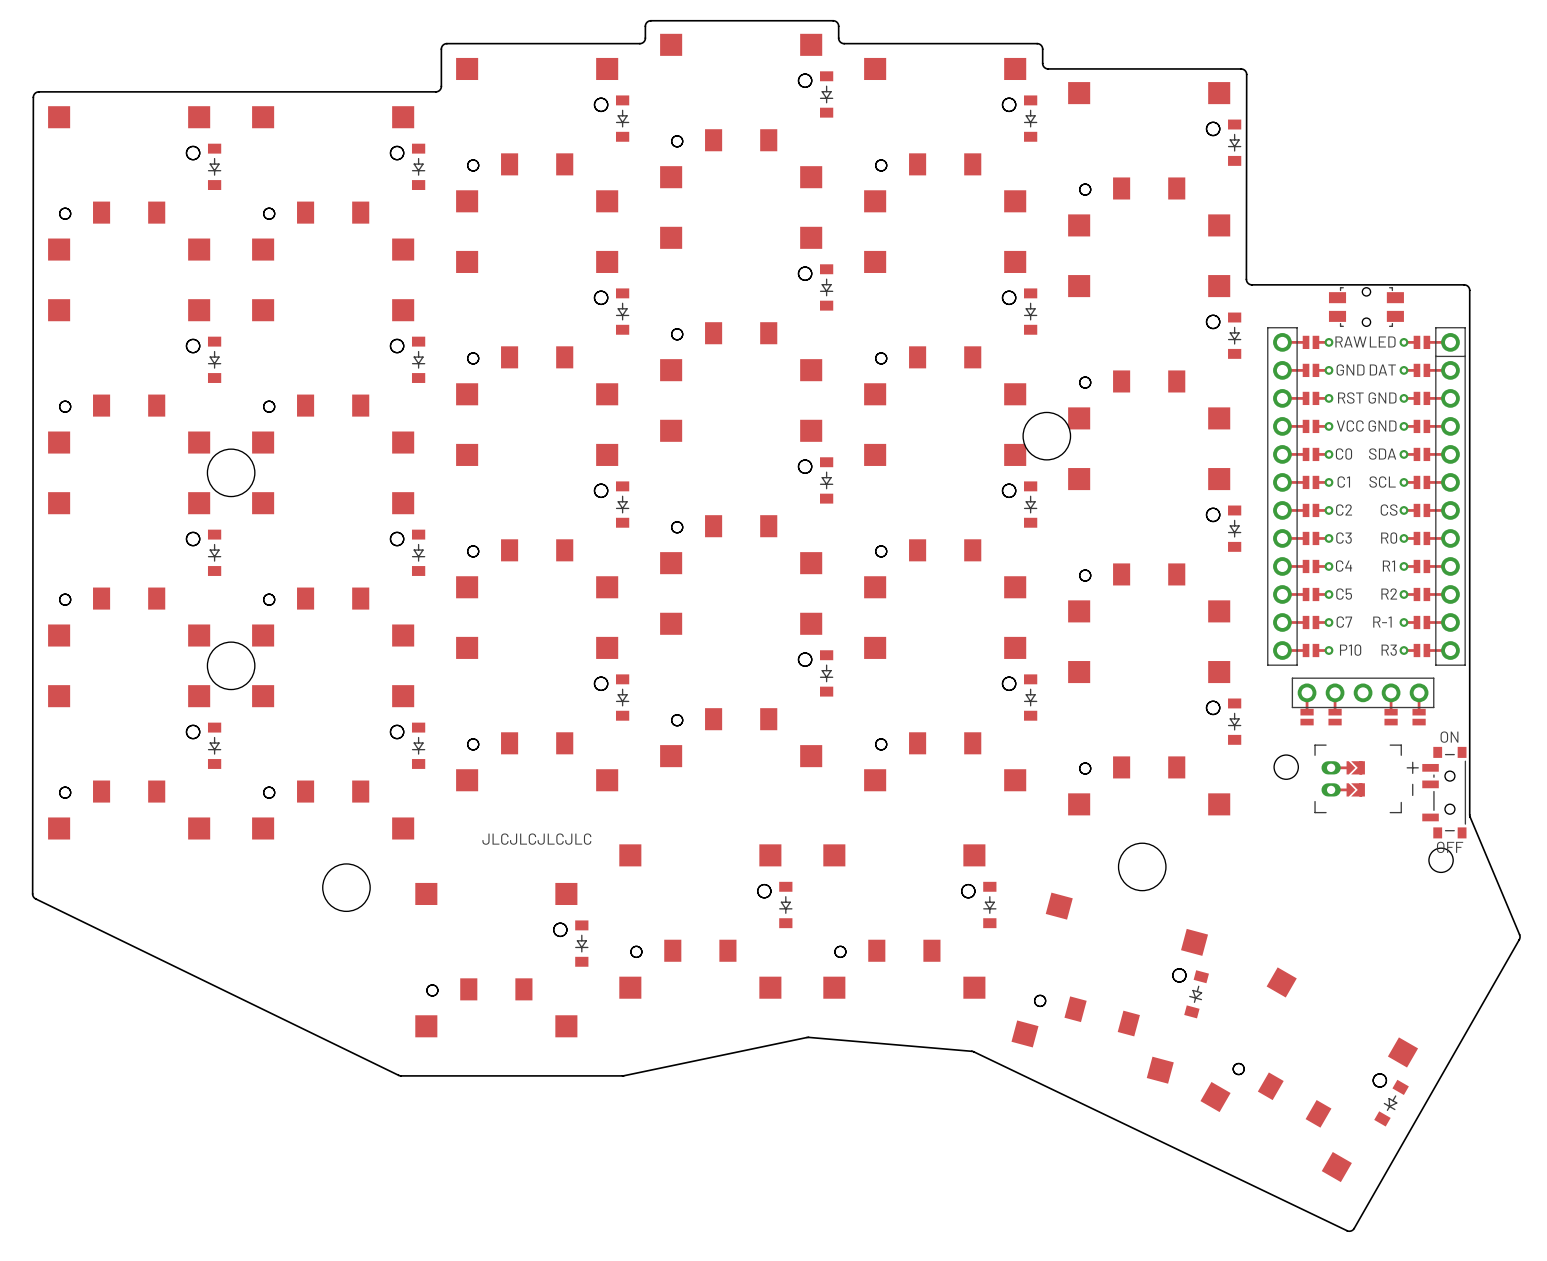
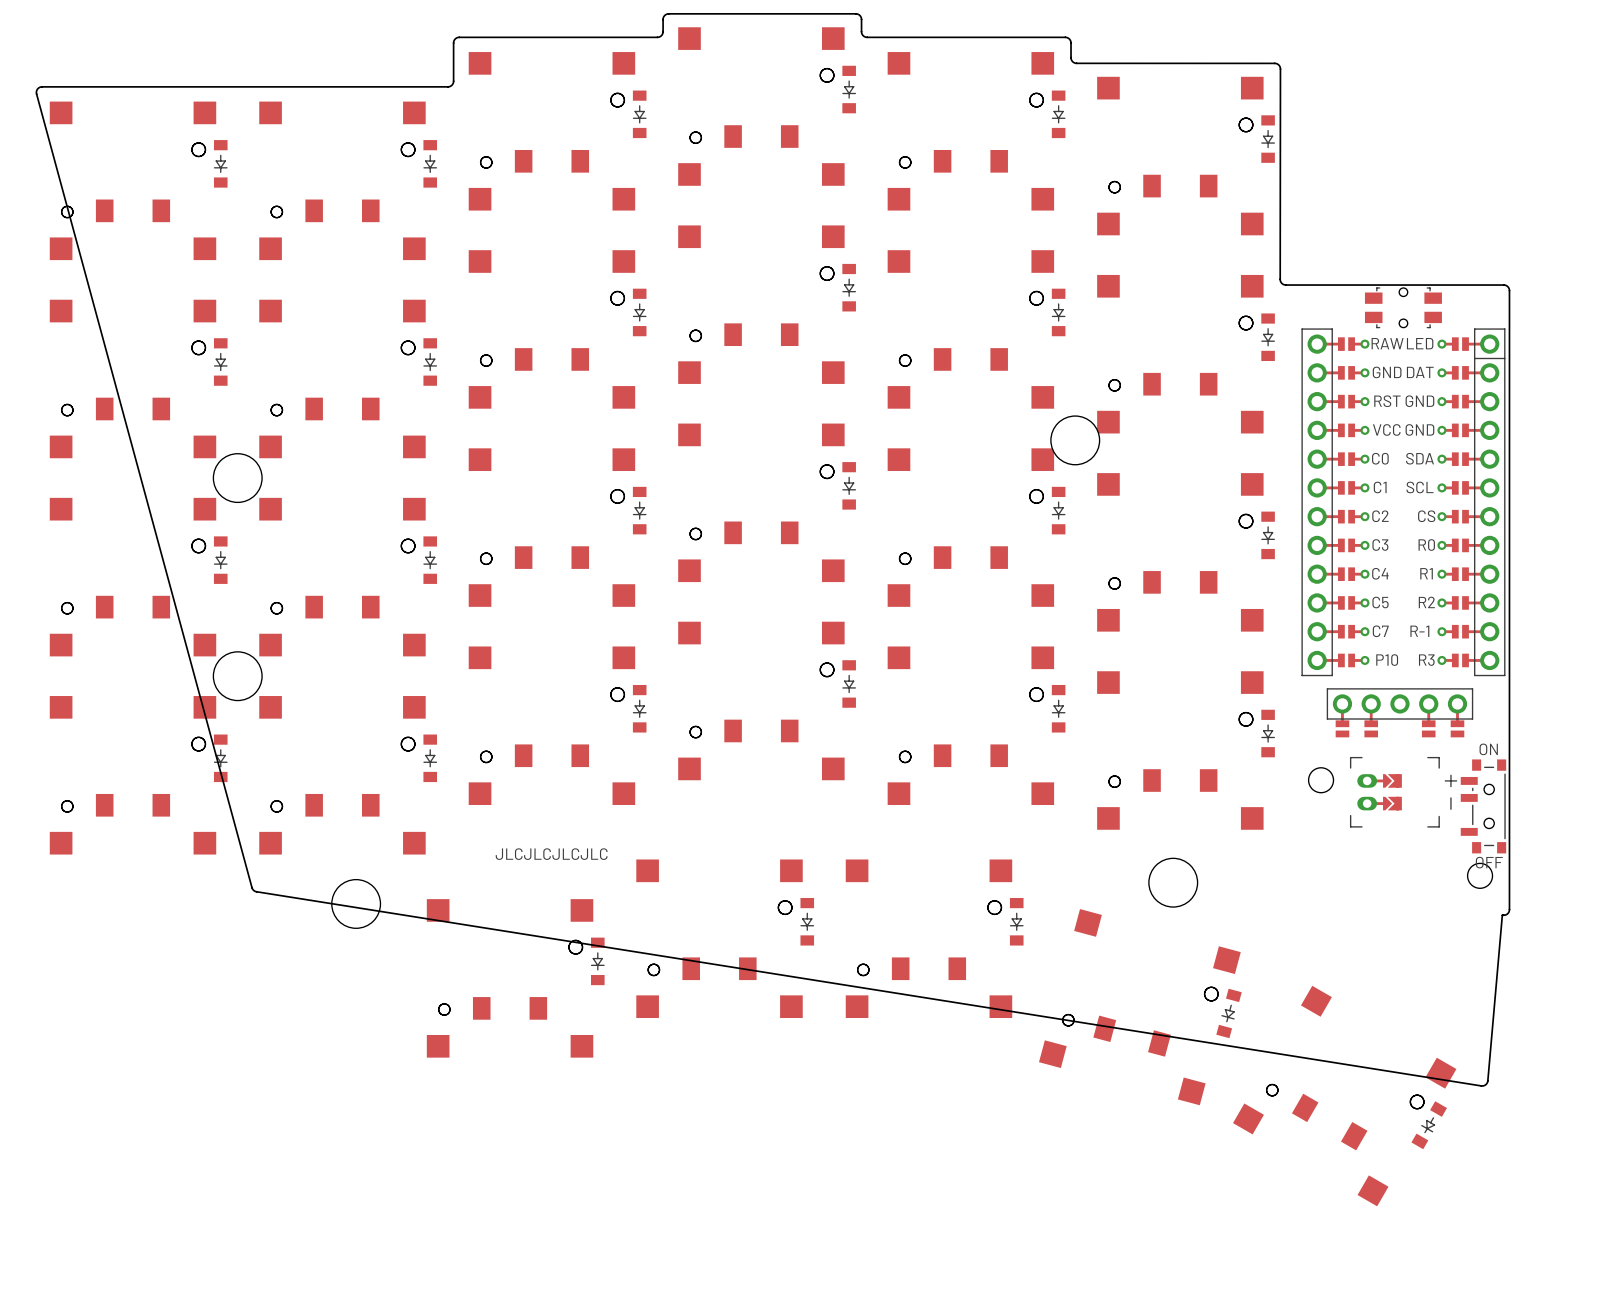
board edge: (40, 91) (35, 93) (33, 97) (32, 893) (35, 898) (399, 1075) (623, 1075) (807, 1037) (972, 1051) (1349, 1231) (1354, 1228) (1519, 938) (1469, 814) -> (42, 86) (37, 89) (36, 94) (251, 887) (254, 891) (1482, 1085) (1487, 1080) (1502, 915) (1506, 914) (1509, 910) (1509, 829)

